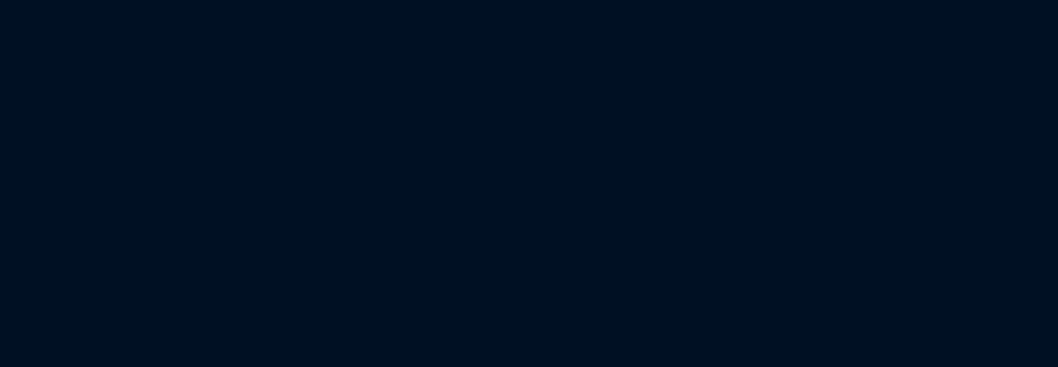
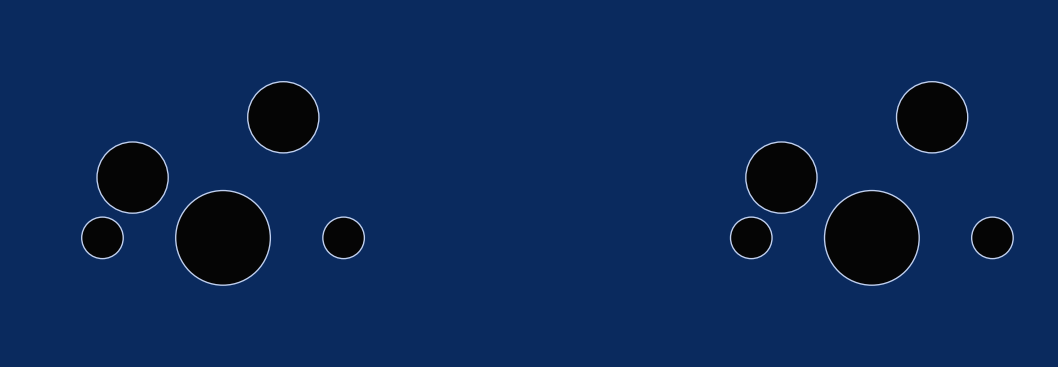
part: none -> (223, 183)
part: none -> (871, 183)

